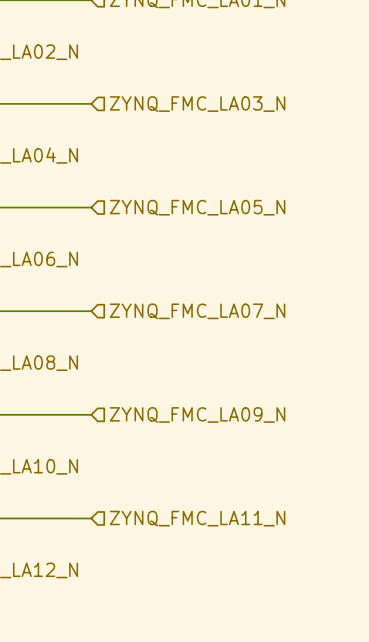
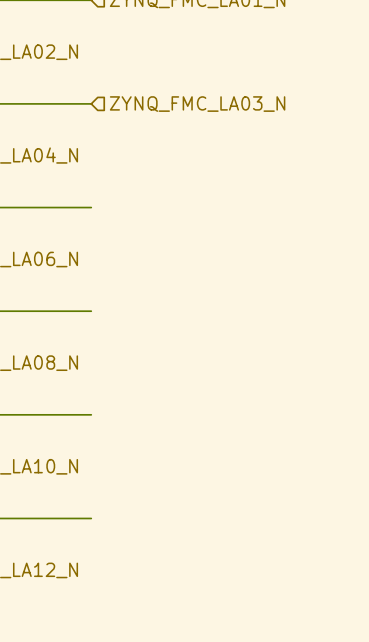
hierarchical label: ZYNQ_FMC_LA05_N (197, 207) -> none
hierarchical label: ZYNQ_FMC_LA07_N (197, 311) -> none
hierarchical label: ZYNQ_FMC_LA09_N (197, 414) -> none
hierarchical label: ZYNQ_FMC_LA11_N (197, 518) -> none

